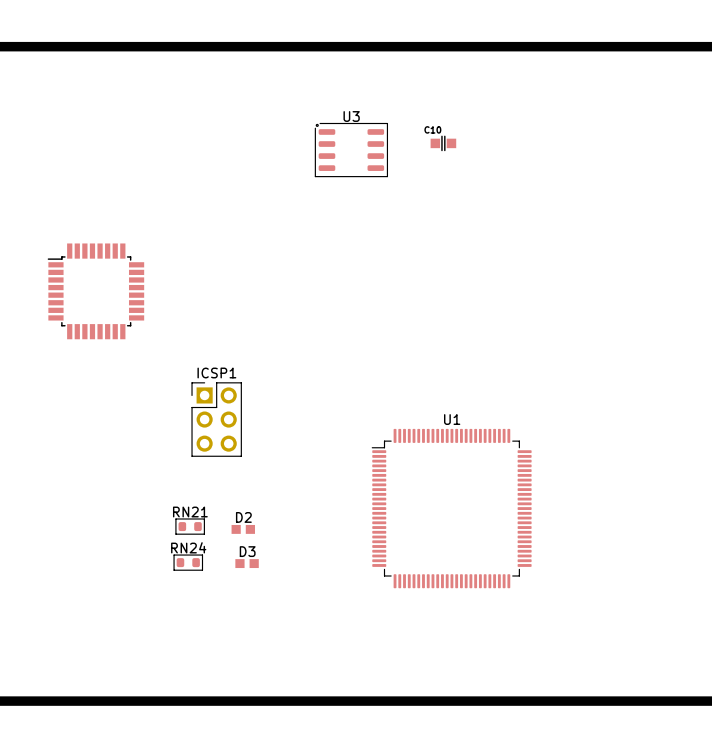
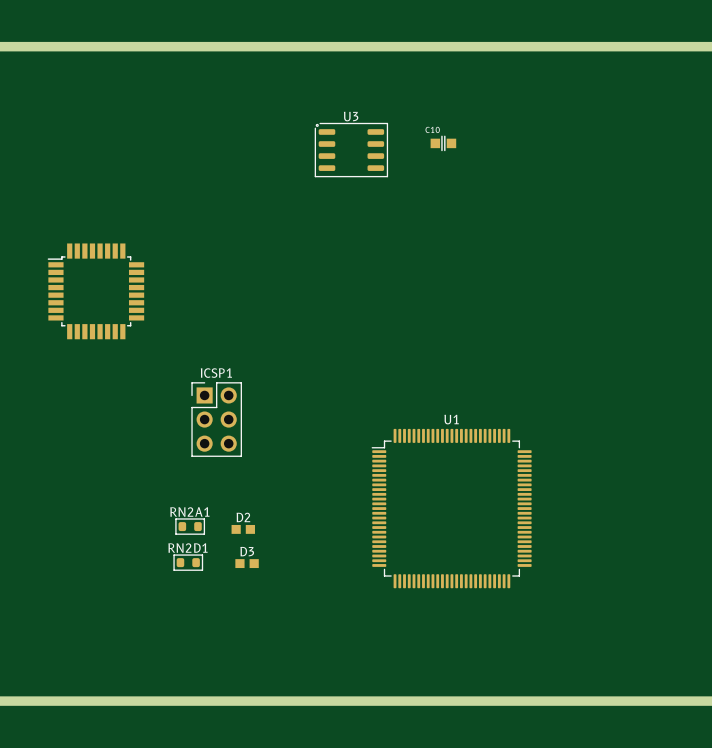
RN21 name: RN21 (190, 512) -> RN2A1 (189, 512)
RN24 name: RN24 (188, 547) -> RN2D1 (187, 548)

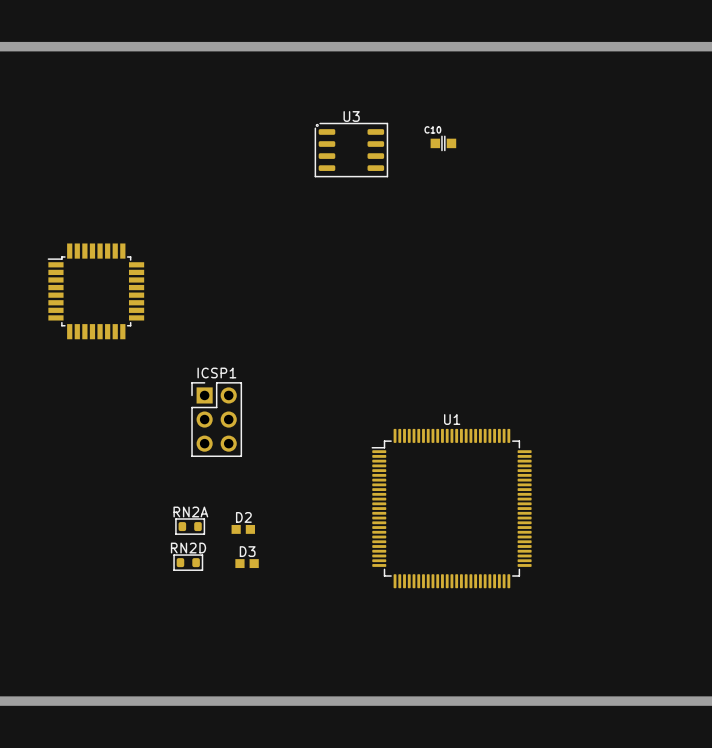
RN2A1 name: RN2A1 (189, 512) -> RN2A (190, 512)
RN2D1 name: RN2D1 (187, 548) -> RN2D (188, 548)

